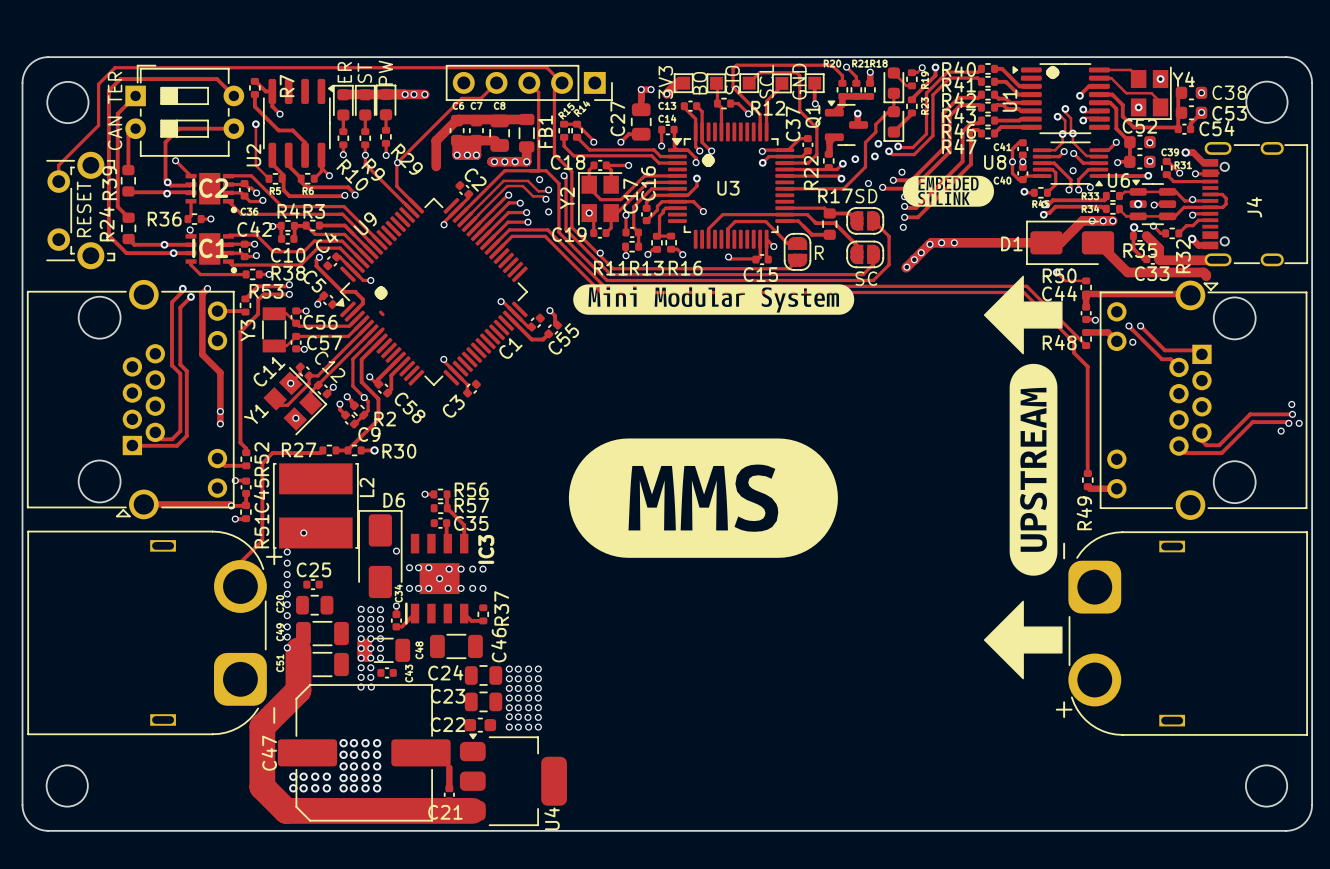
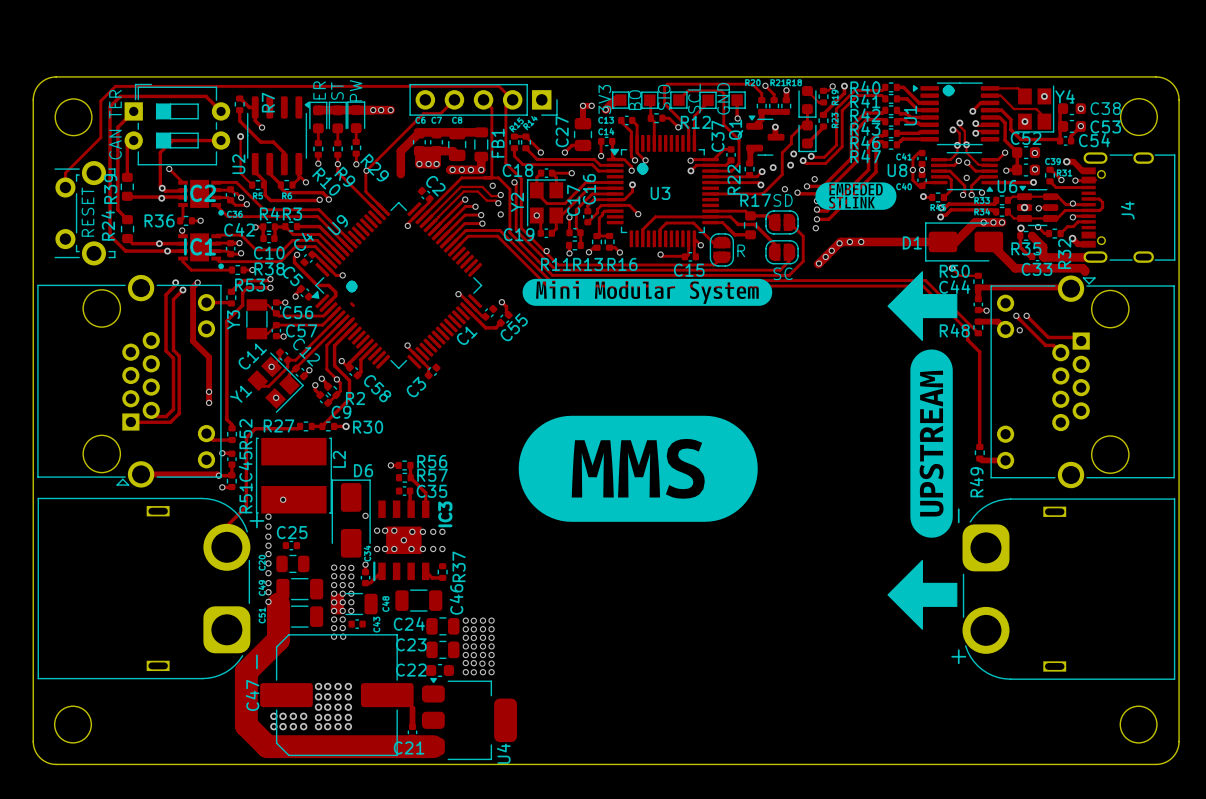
via: (1291, 404) -> none
track: (1292, 414) (1250, 414) (1219, 445) (1206, 445) (1201, 440) (1201, 432) -> none
via: (1292, 414) -> none
track: (1288, 423) (1252, 422) (1221, 453) (1185, 453) (1178, 446) -> none
via: (1288, 423) -> none
via: (1299, 423) -> none
via: (1281, 431) -> none

